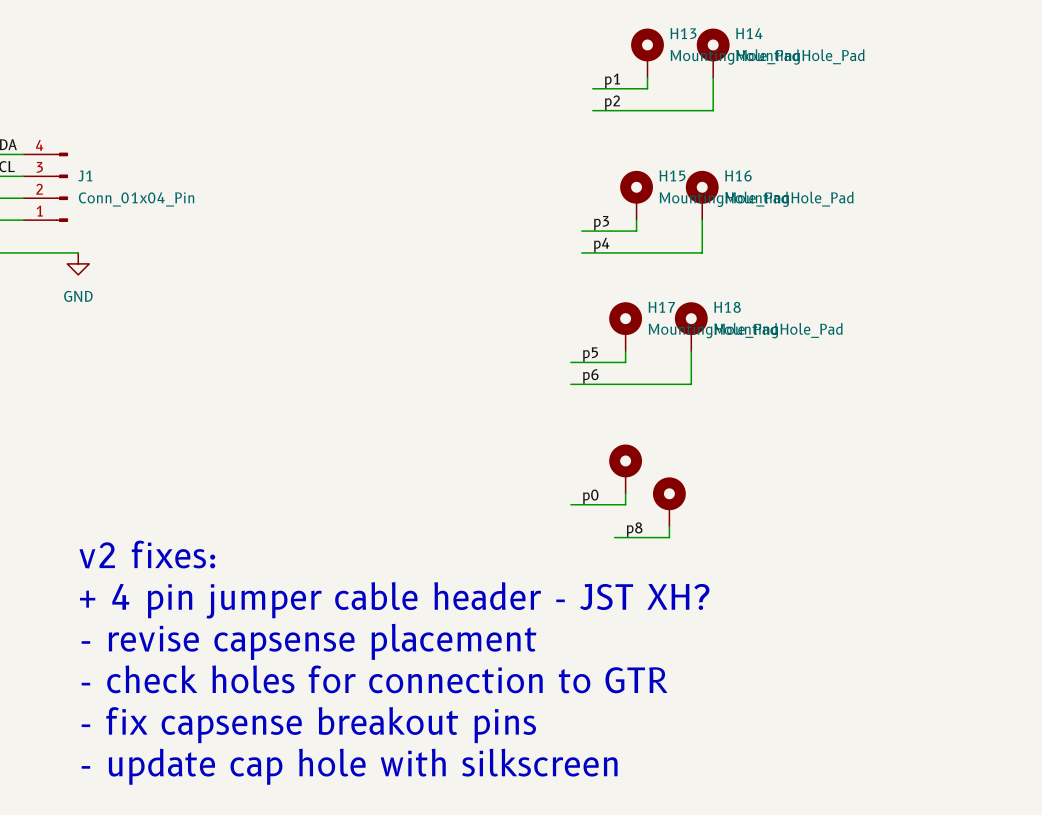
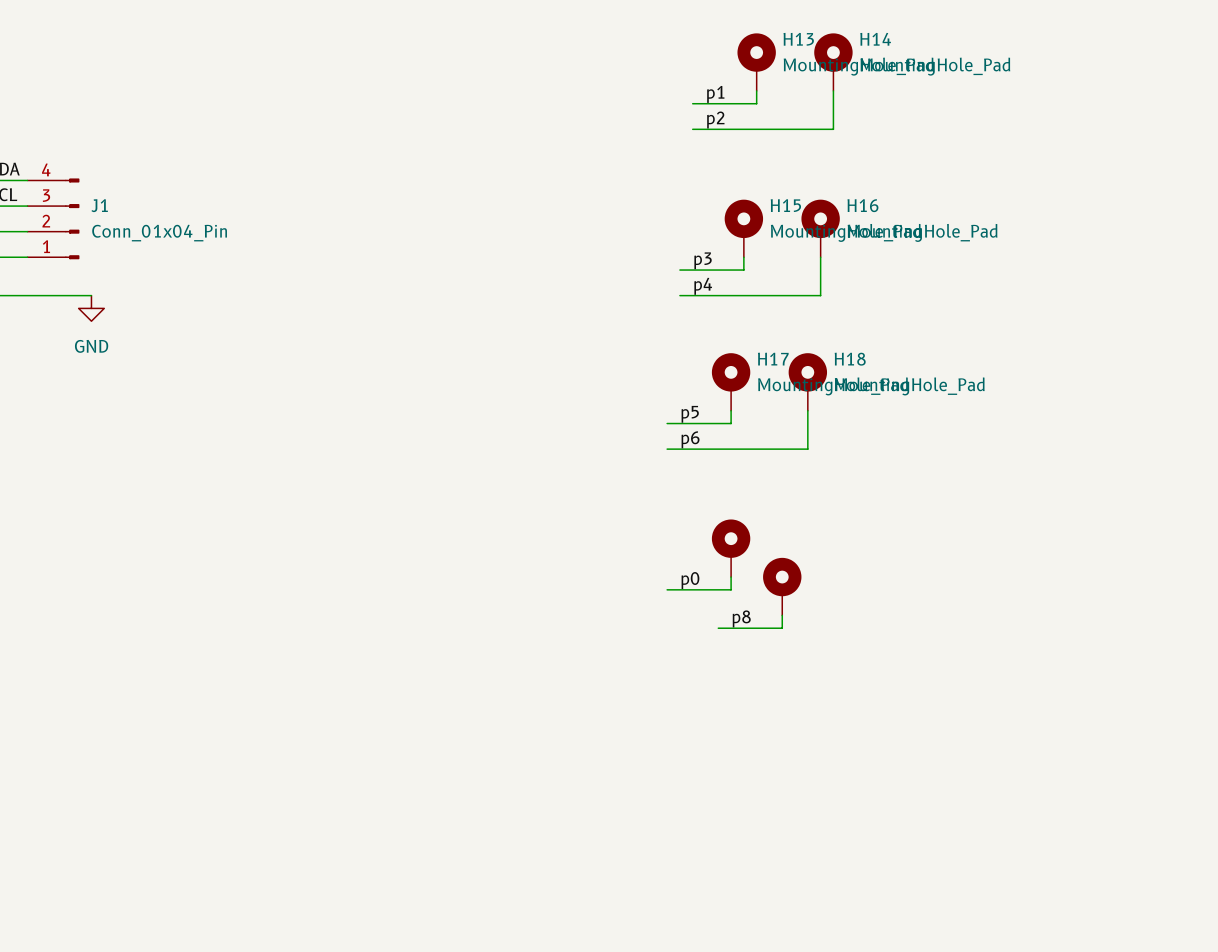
text: v2 fixes: (147, 554) -> none
text: + 4 pin jumper cable header - JST XH? (394, 600) -> none
text: - revise capsense placement (308, 641) -> none
text: - check holes for connection to GTR (374, 679) -> none
text: - fix capsense breakout pins (308, 725) -> none
text: - update cap hole with silkscreen (349, 766) -> none

